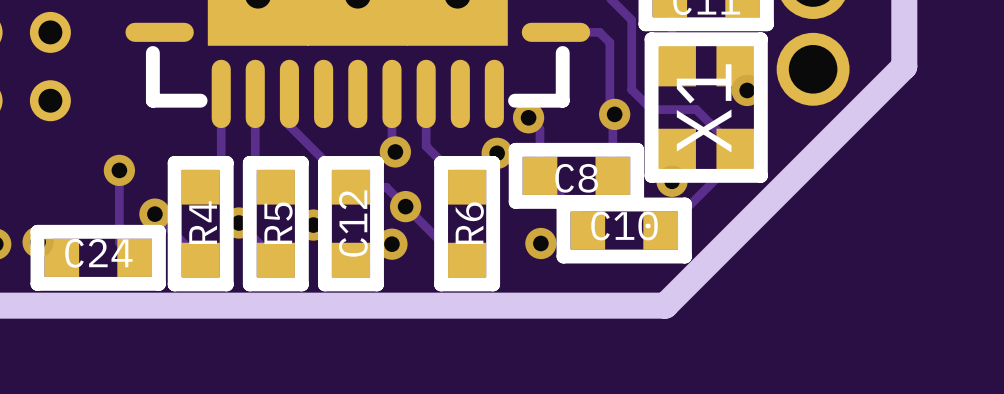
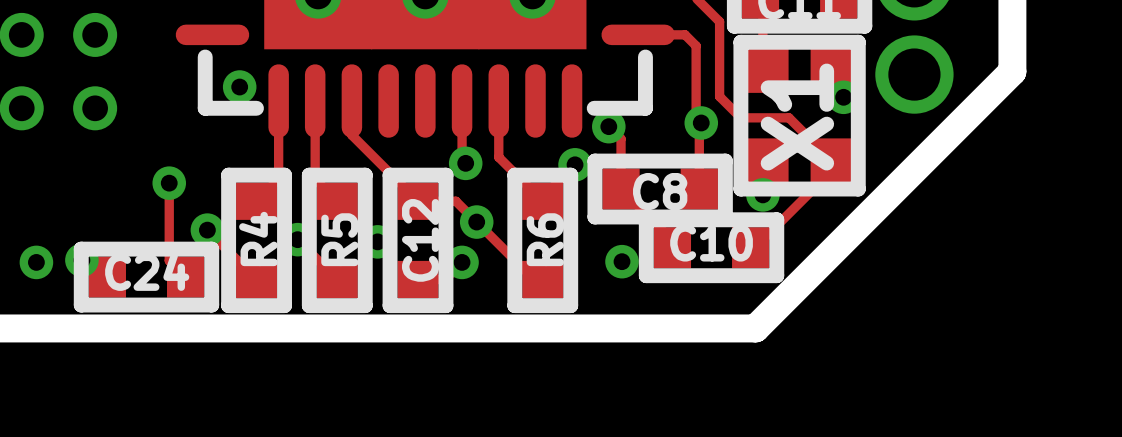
via: none -> (239, 87)

